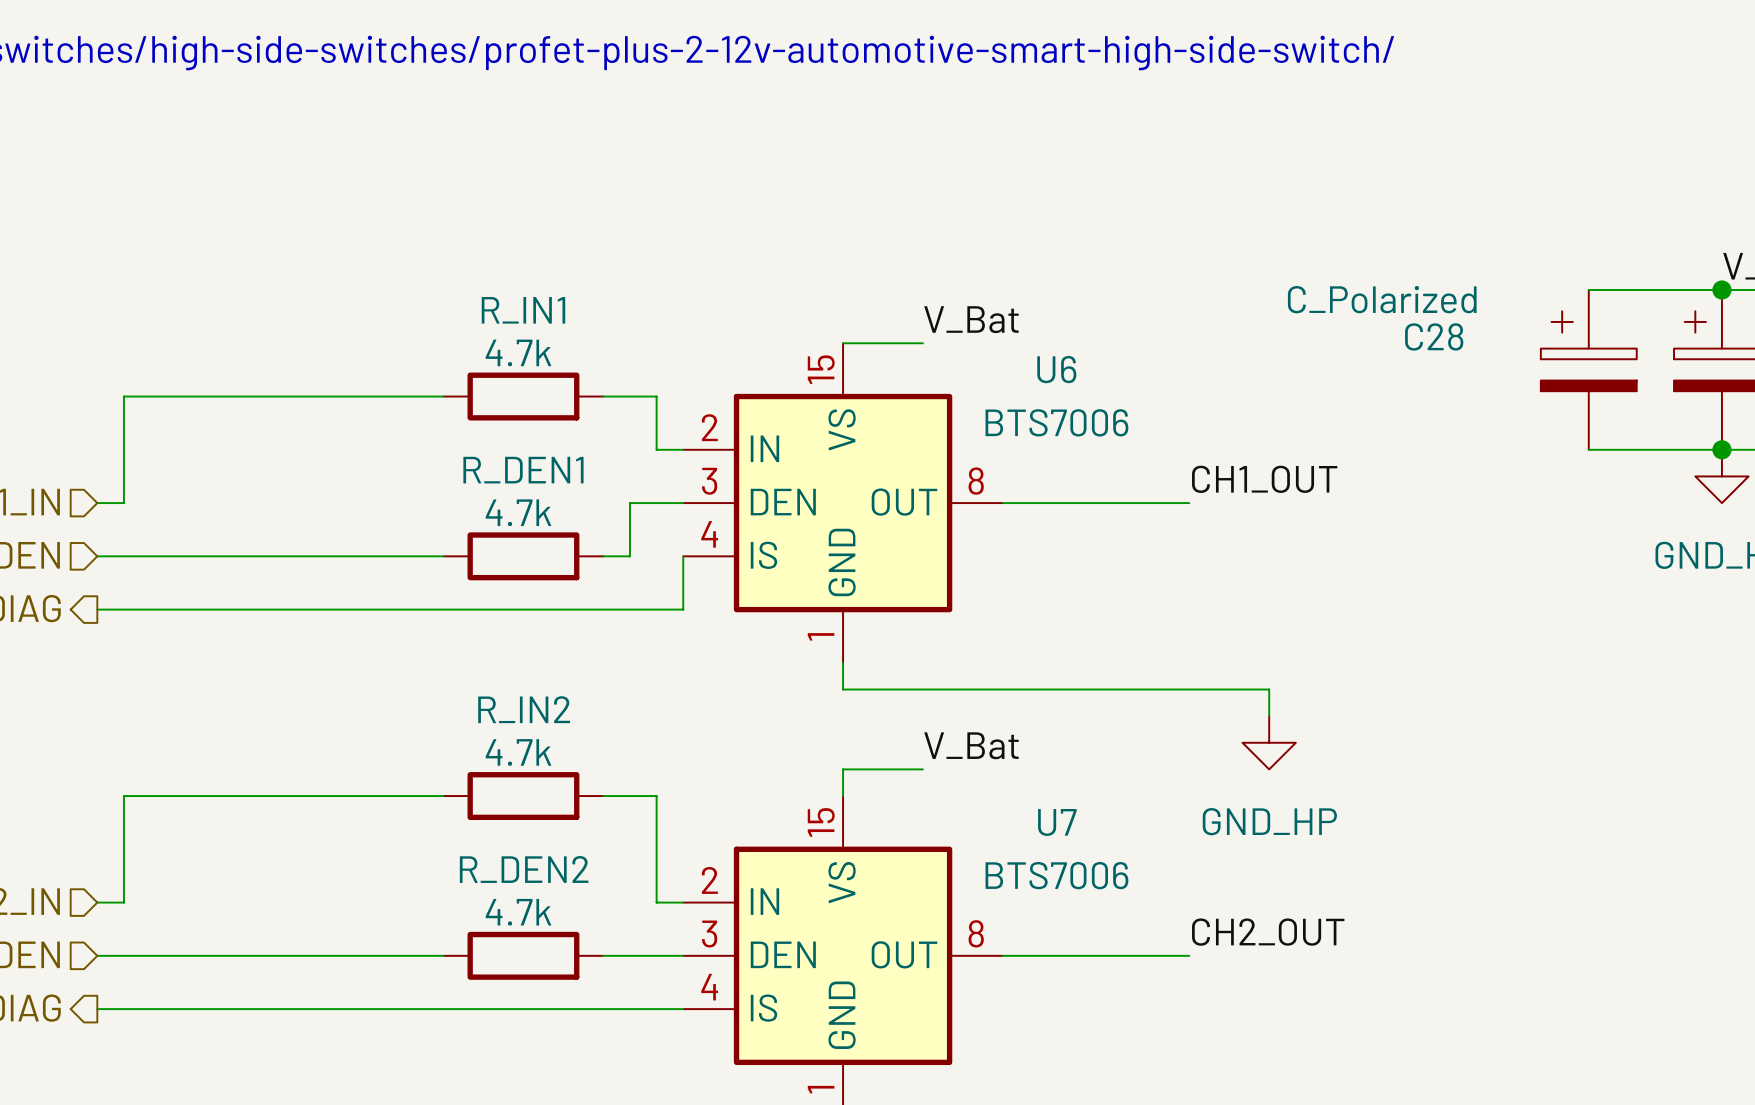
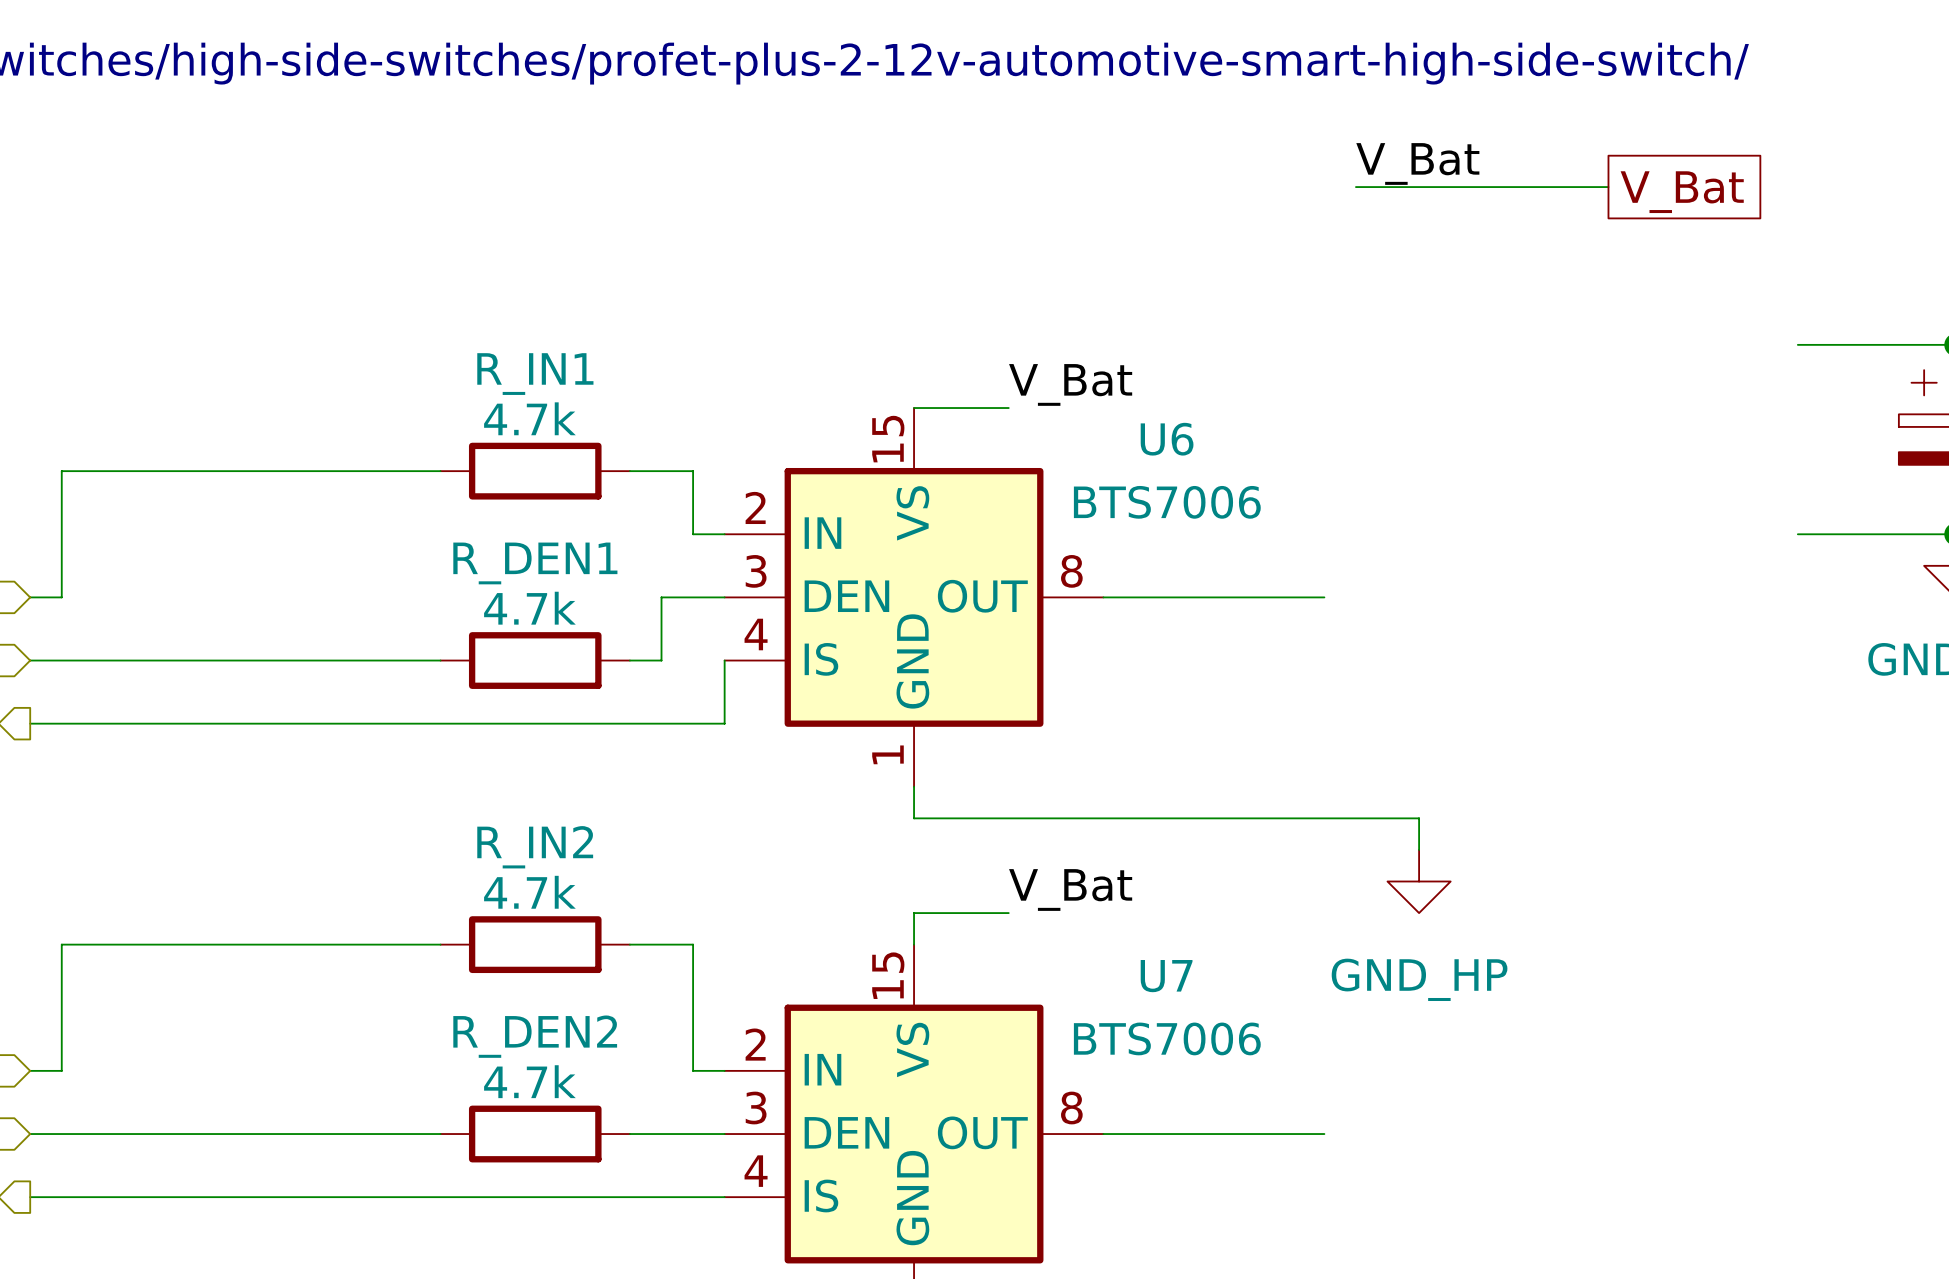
label: none -> V_Bat (1417, 163)
wire: none -> (1355, 187) (1608, 187)
global label: none -> V_Bat (1682, 192)
C28: C_Polarized (1588, 369) -> none
label: CH1_OUT (1264, 479) -> none
label: CH2_OUT (1268, 932) -> none

